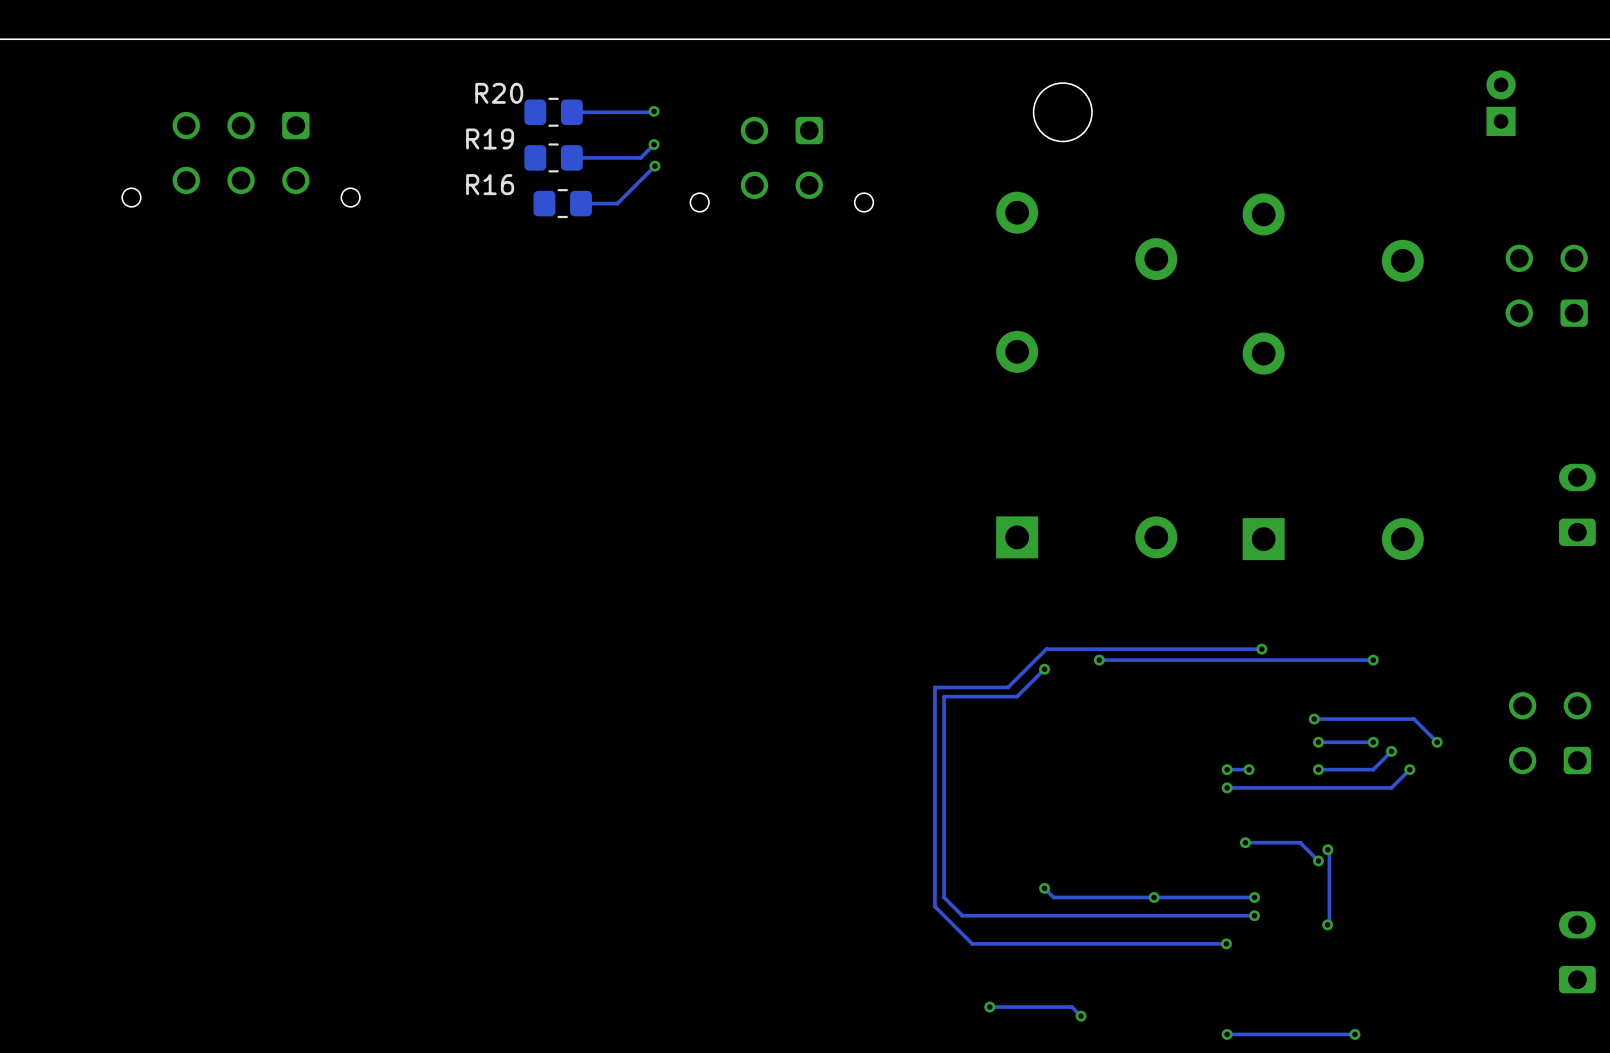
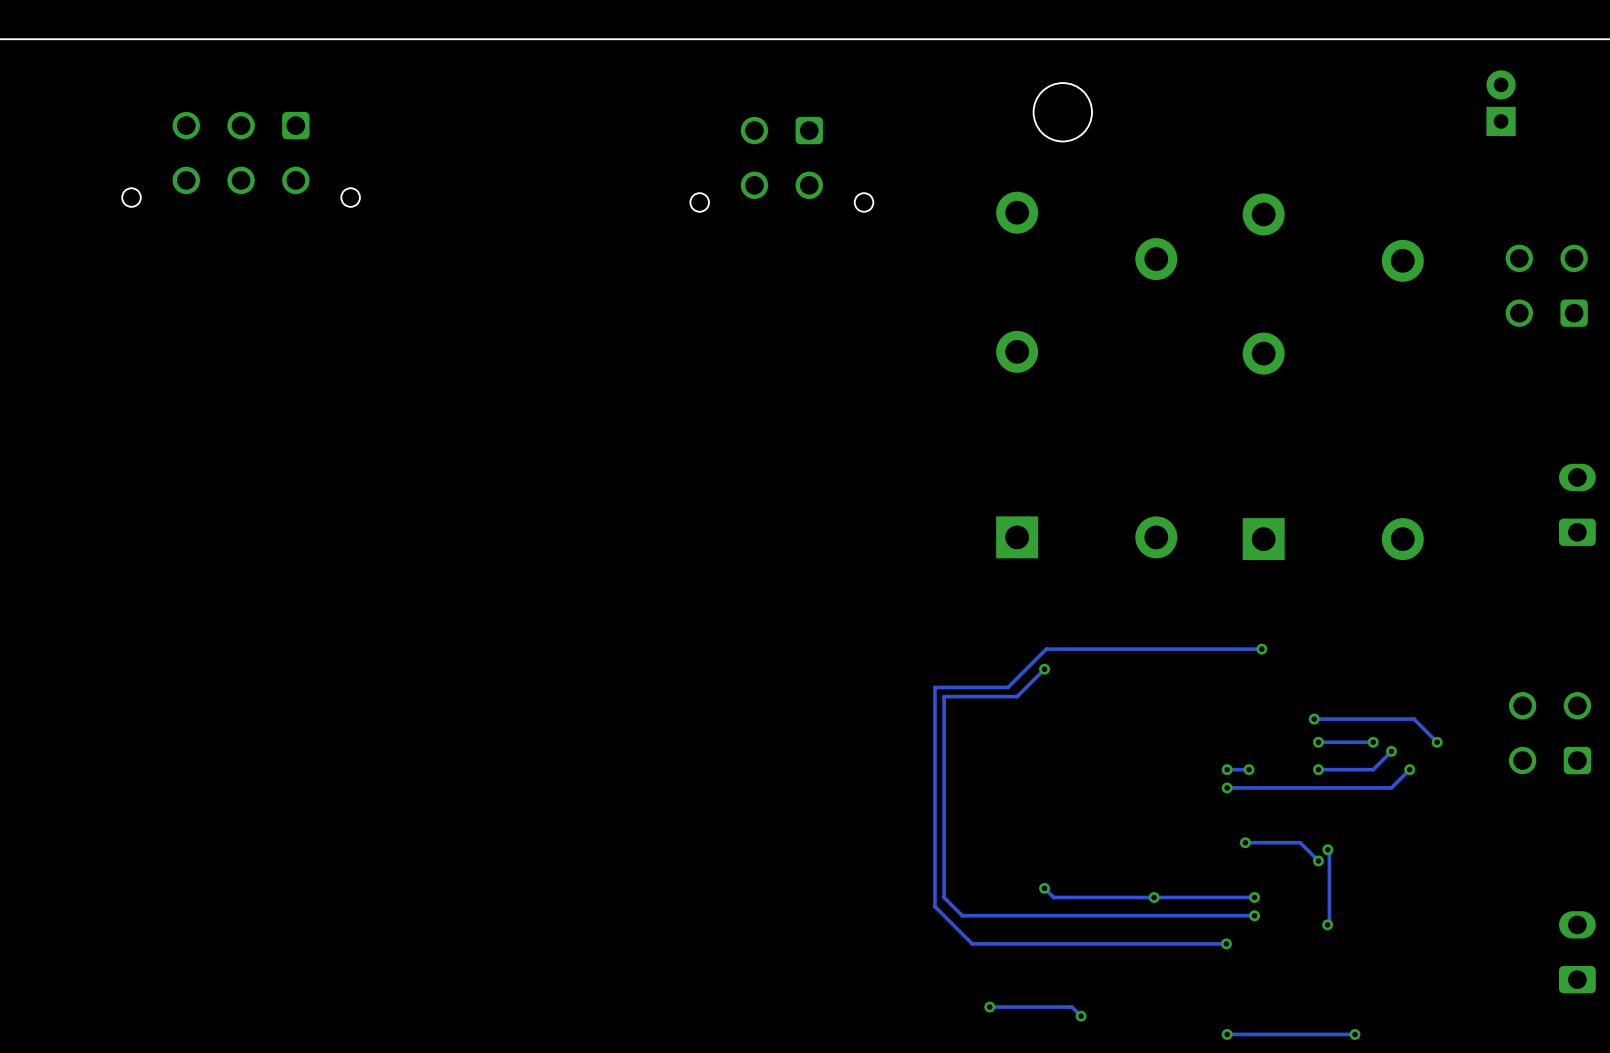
track: (654, 111) (571, 112) -> none
via: (654, 111) -> none
R20: (553, 112) -> none
track: (654, 144) (640, 157) (571, 157) -> none
via: (654, 144) -> none
R19: (553, 157) -> none
track: (654, 166) (617, 203) (580, 203) -> none
via: (654, 166) -> none
R16: (562, 203) -> none
via: (1099, 660) -> none
track: (1373, 660) (1099, 660) -> none
via: (1373, 660) -> none

